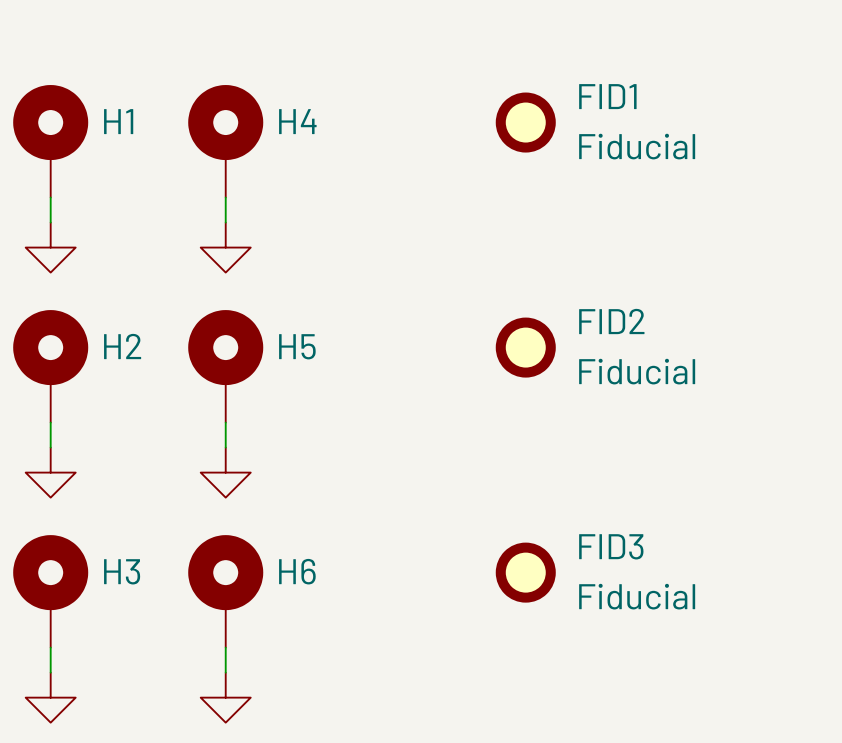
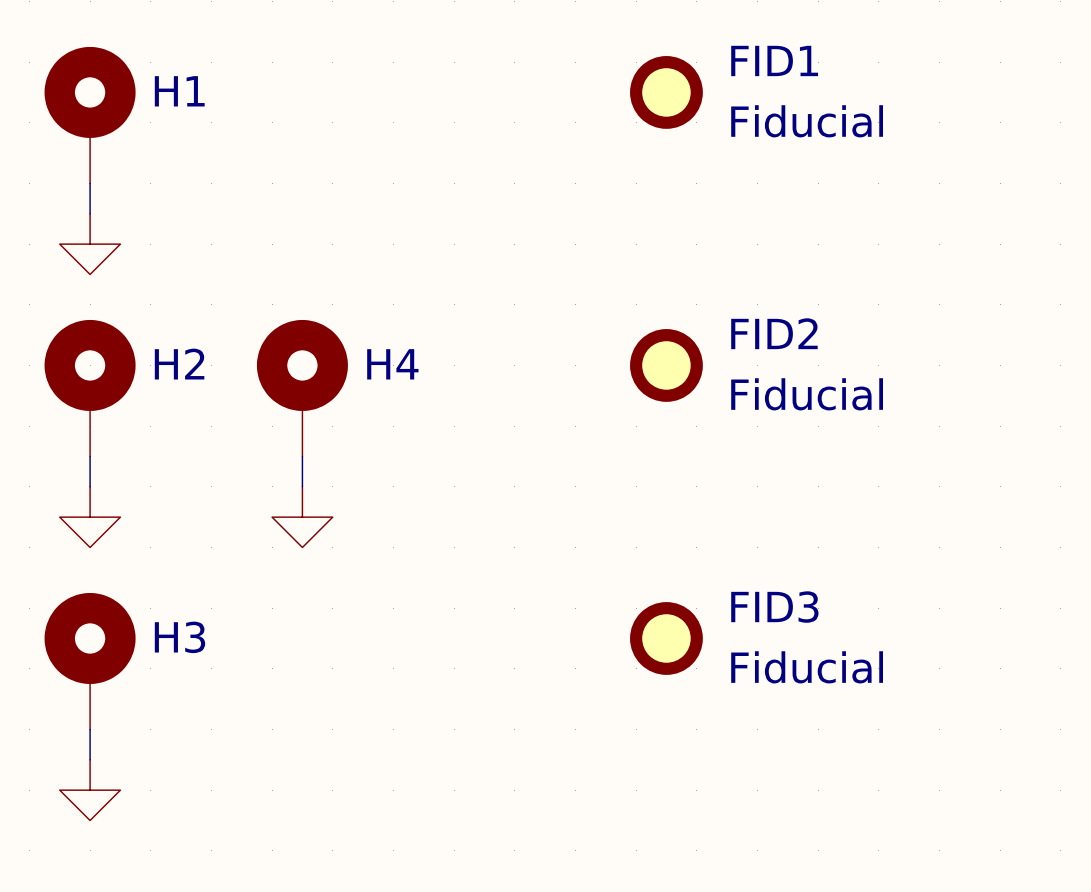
H4: (225, 141) -> none
wire: (225, 197) (225, 222) -> none
power symbol: (225, 247) -> none
H5 name: H5 (297, 346) -> H4 (392, 364)
H6: (225, 591) -> none
wire: (225, 647) (225, 672) -> none
power symbol: (225, 697) -> none

